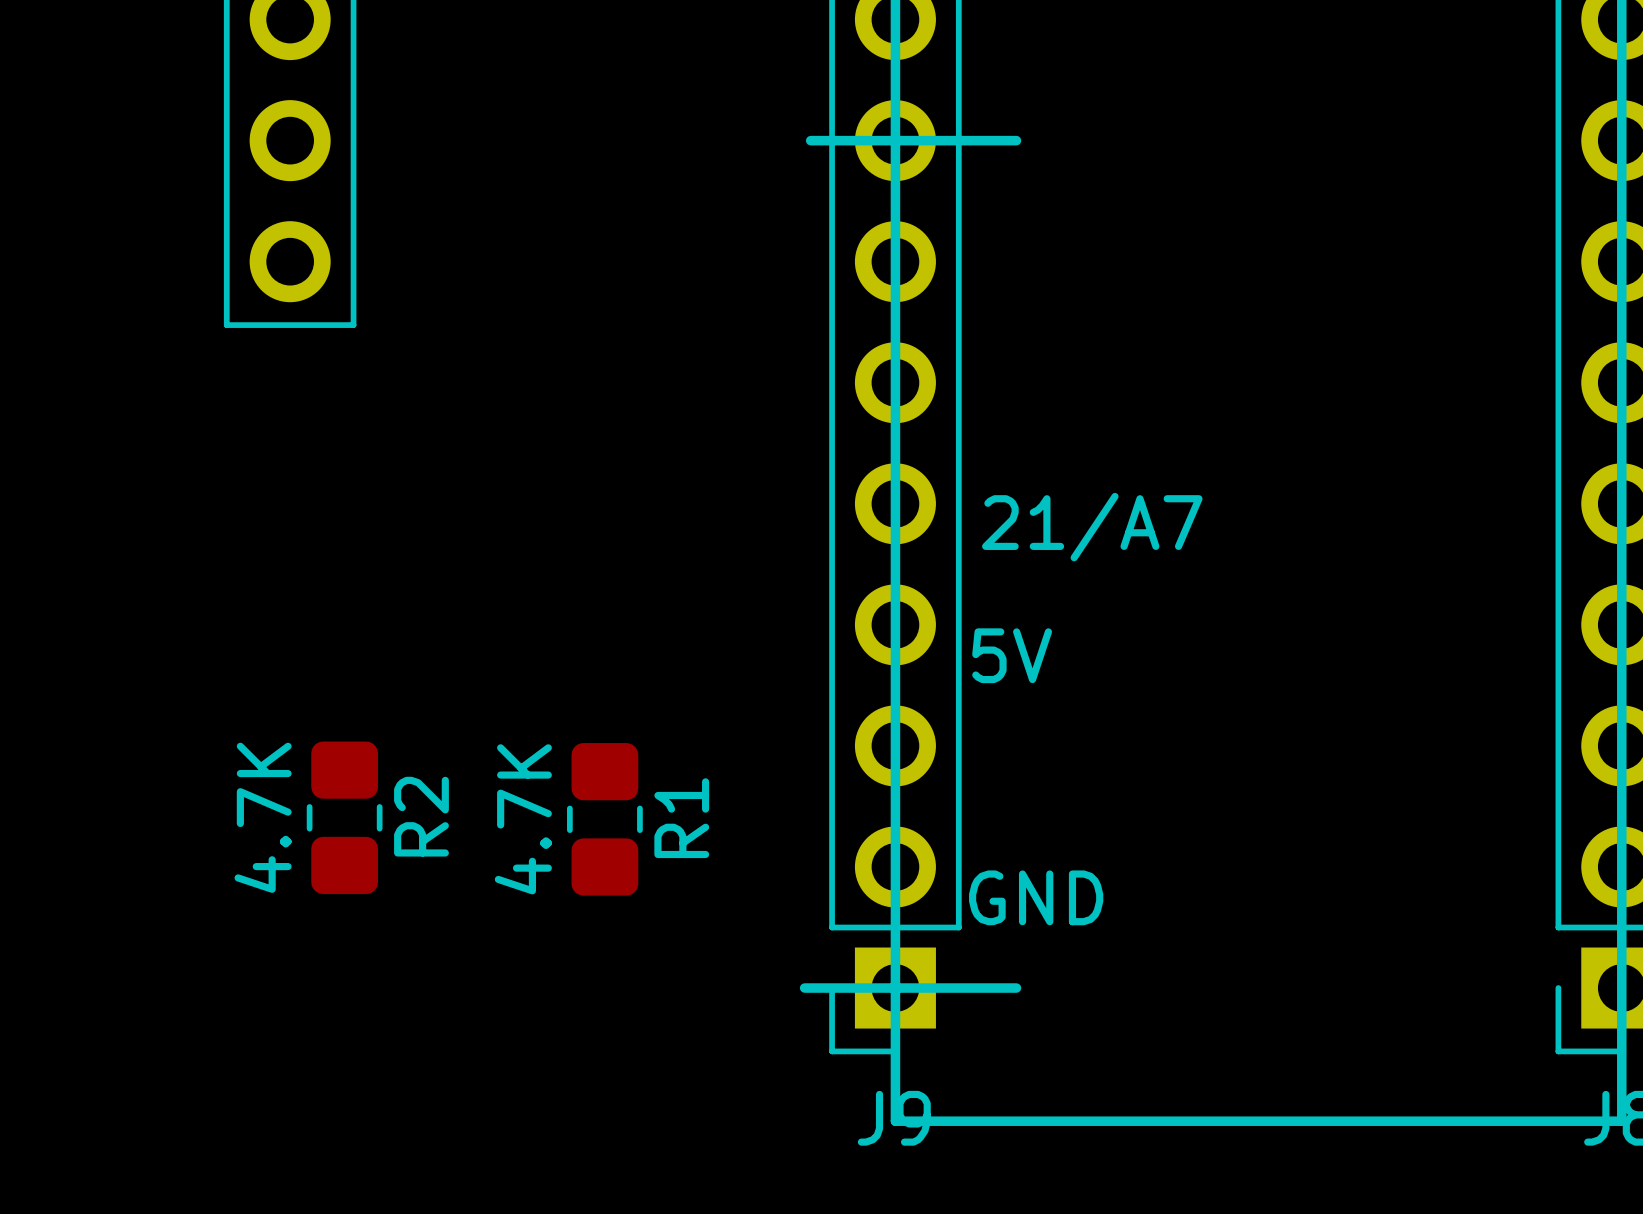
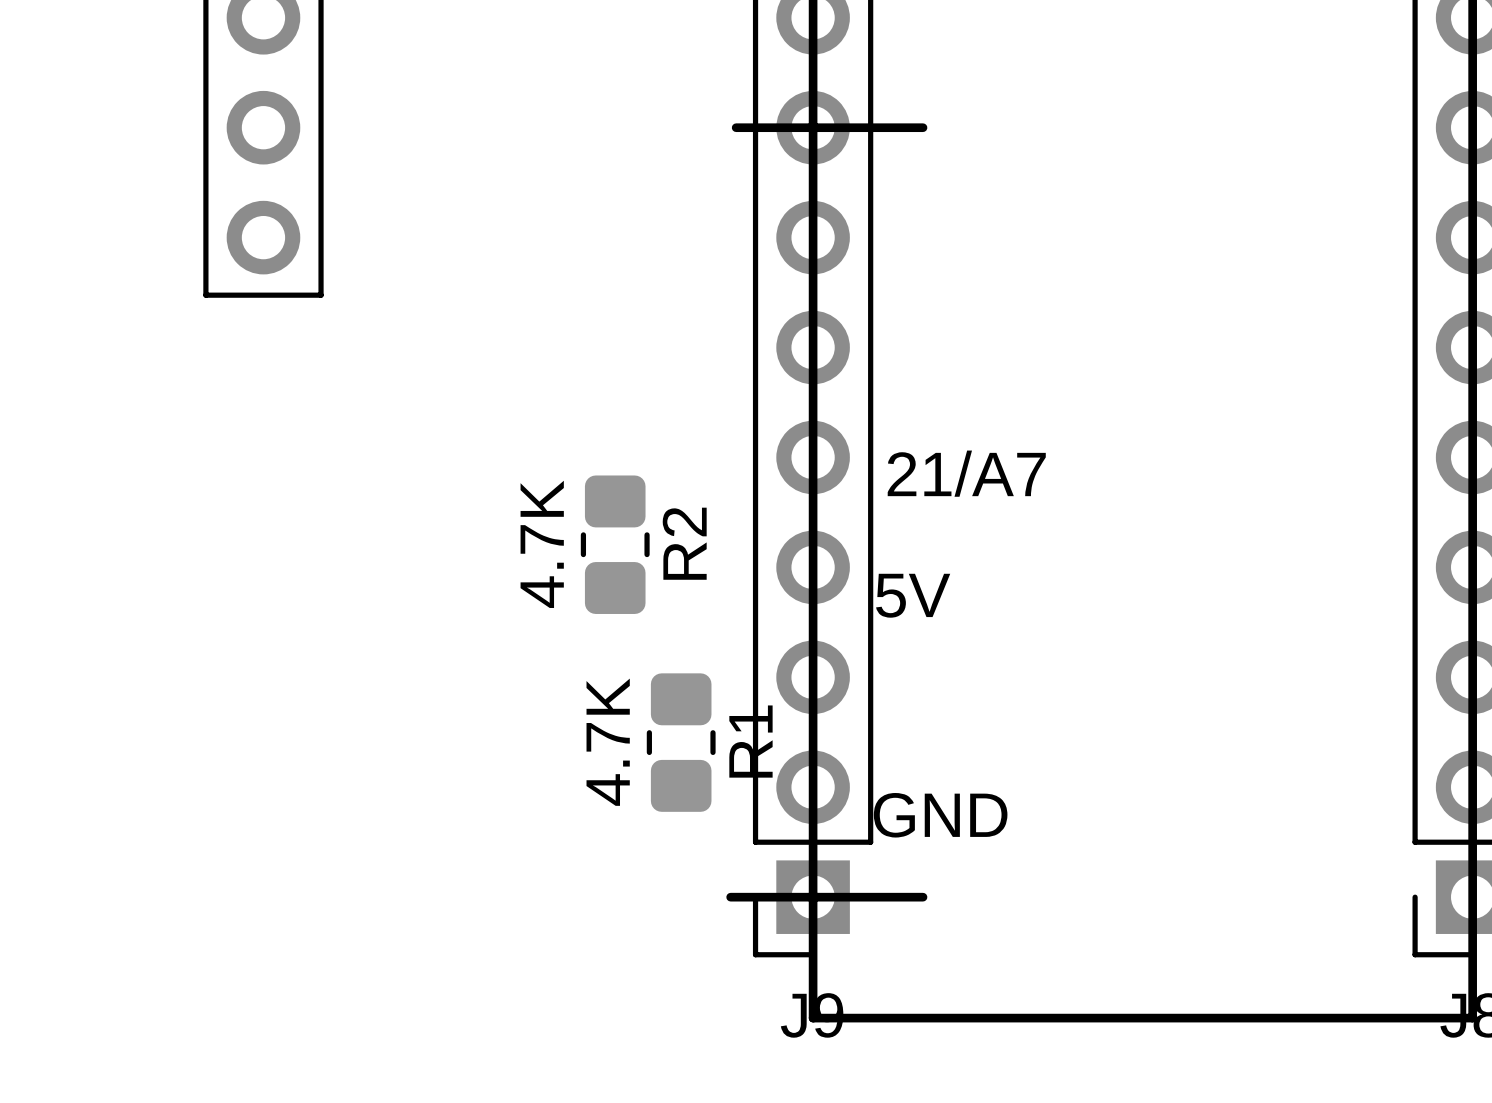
R2 position: (344, 817) -> (615, 544)
R1 position: (604, 819) -> (681, 742)

